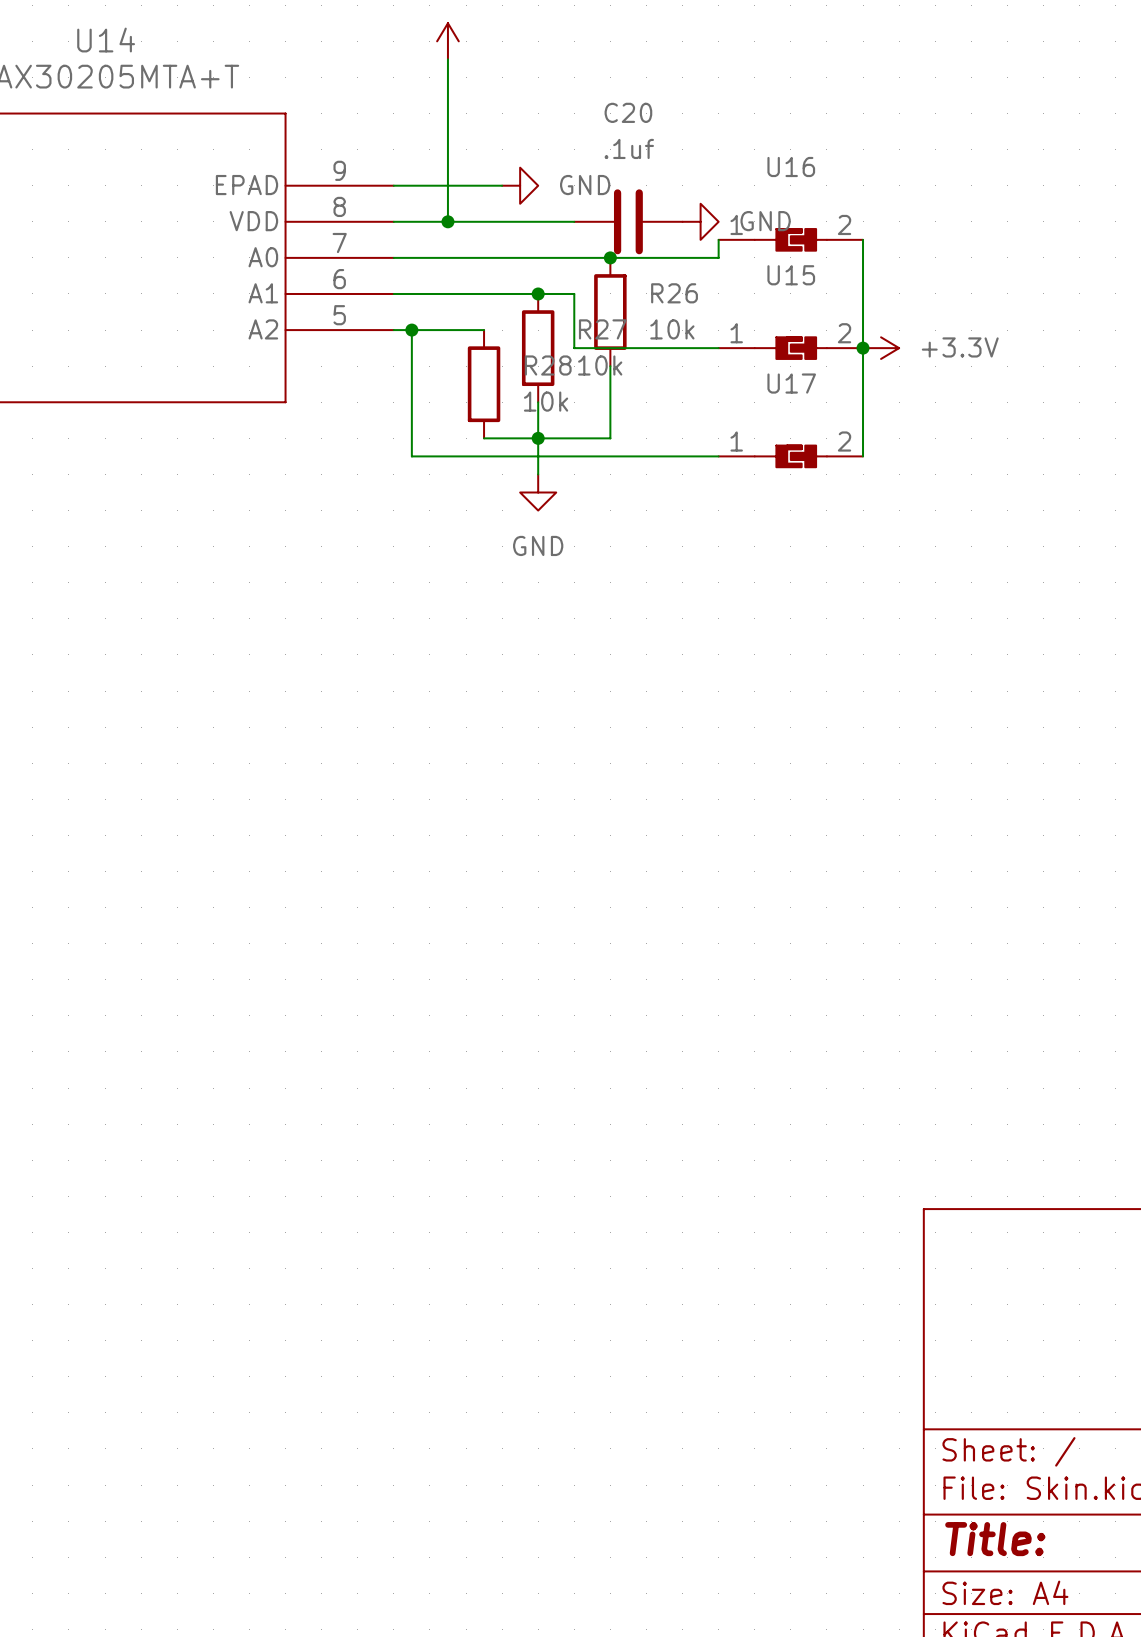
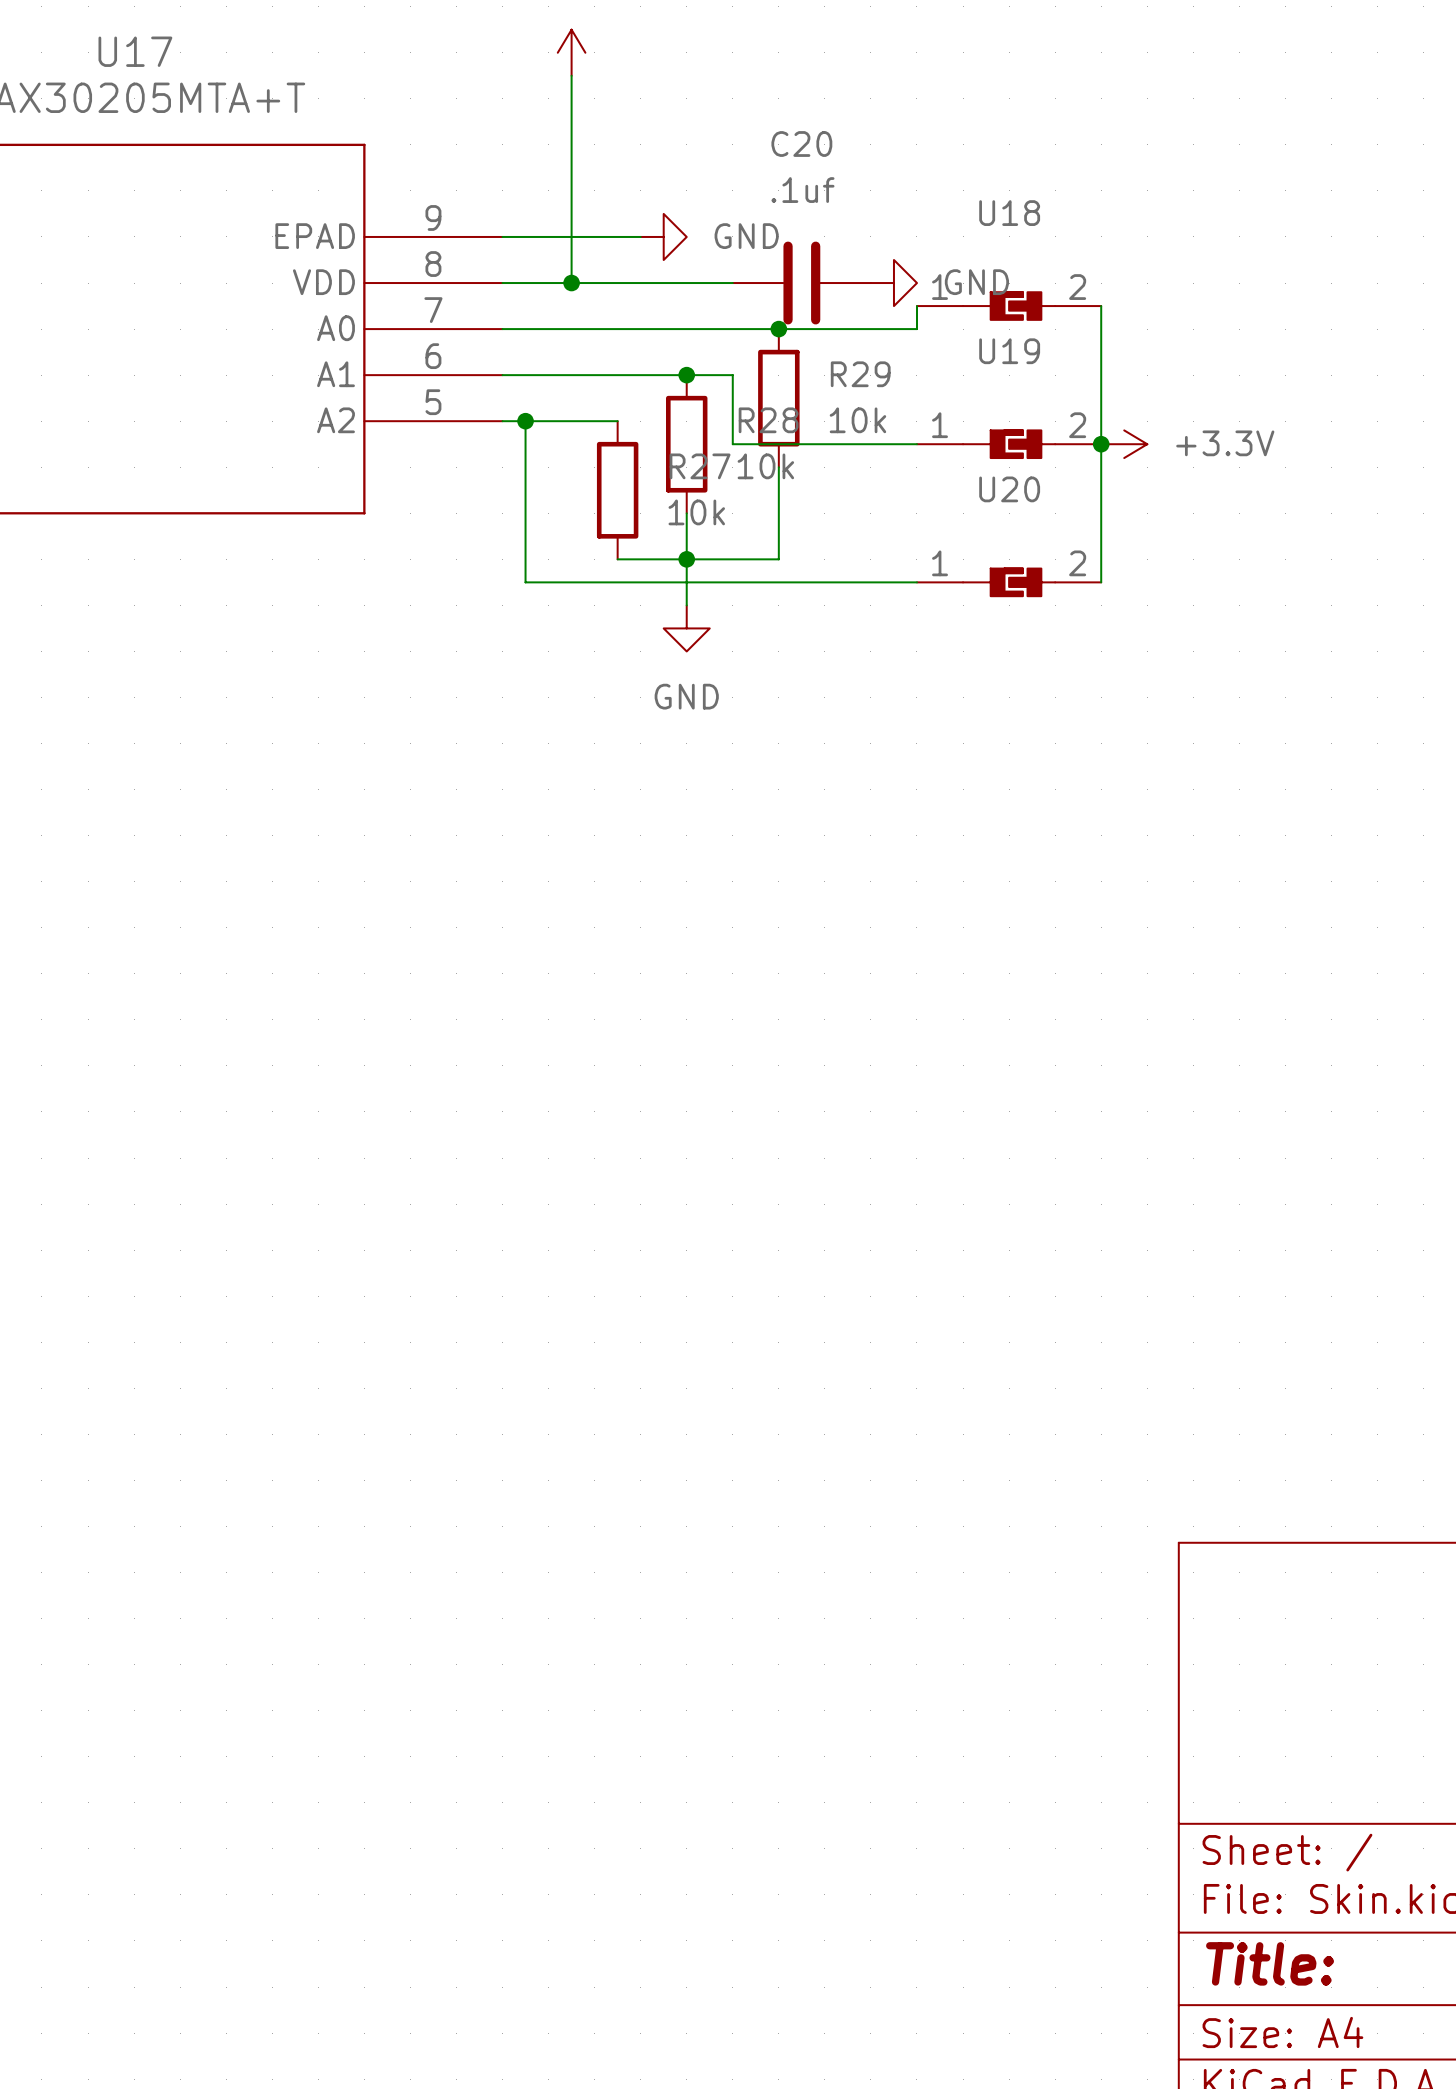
U14 name: U14 (106, 40) -> U17 (135, 51)
U16 name: U16 (791, 166) -> U18 (1009, 213)
U15 name: U15 (791, 275) -> U19 (1009, 351)
R26 name: R26 (674, 293) -> R29 (860, 374)
R27 name: R27 (602, 329) -> R28 (768, 420)
R28 name: R28 (548, 365) -> R27 (700, 466)
U17 name: U17 (791, 383) -> U20 (1009, 489)

